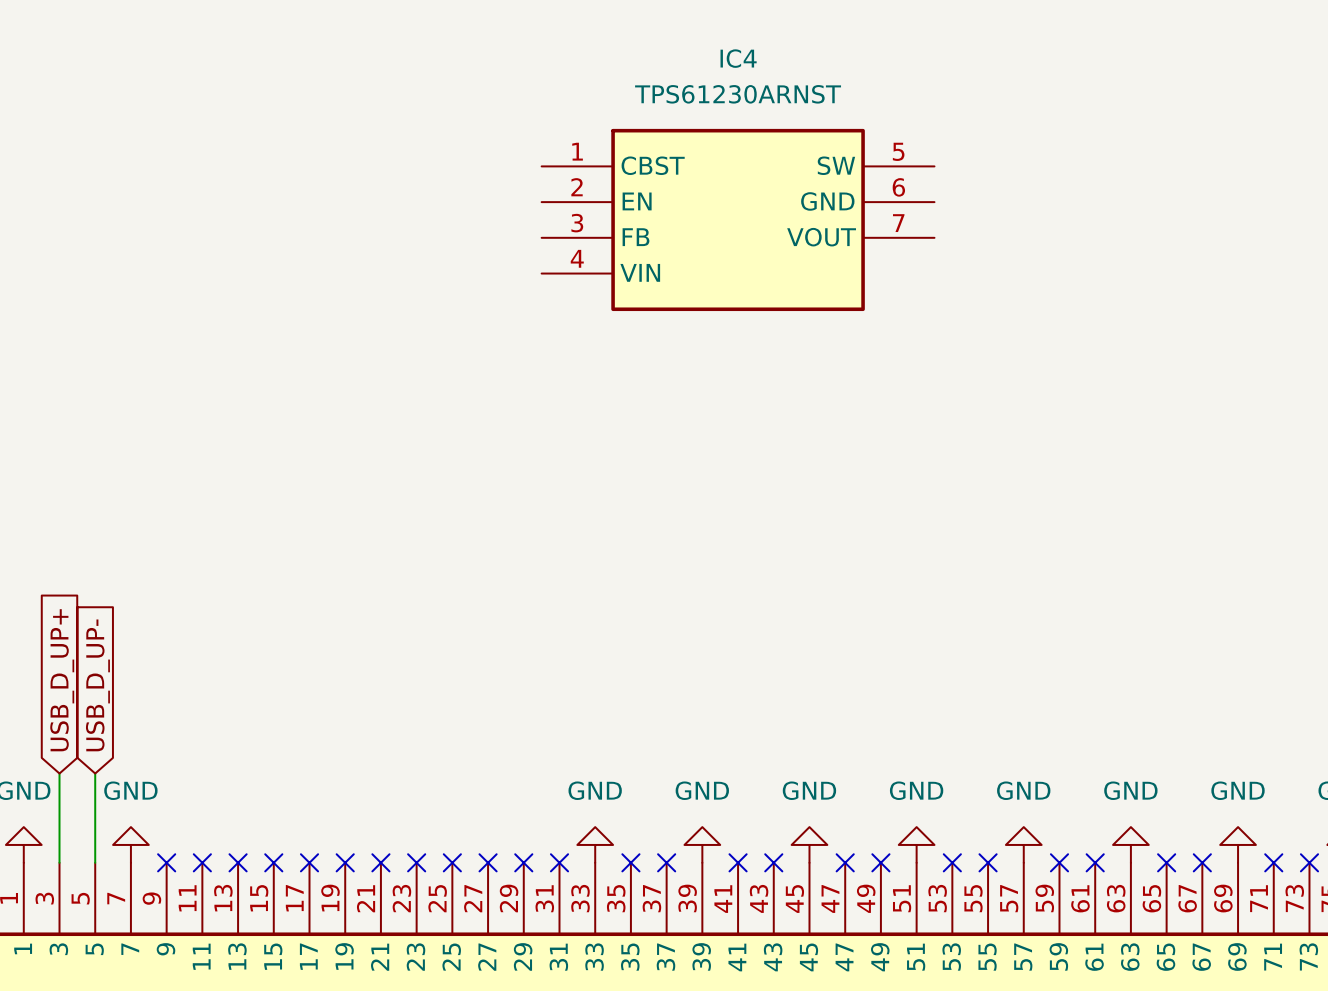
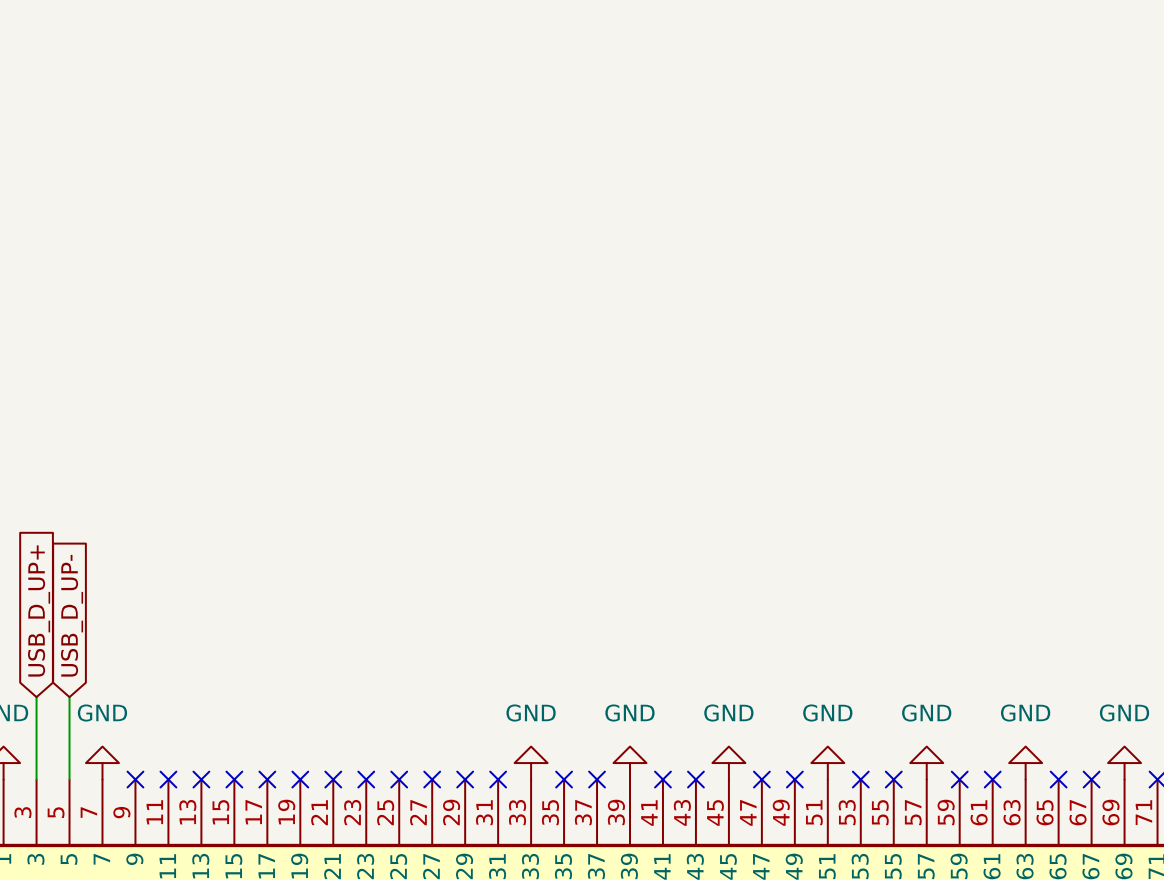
IC4: TPS61230ARNST (738, 219) -> none

